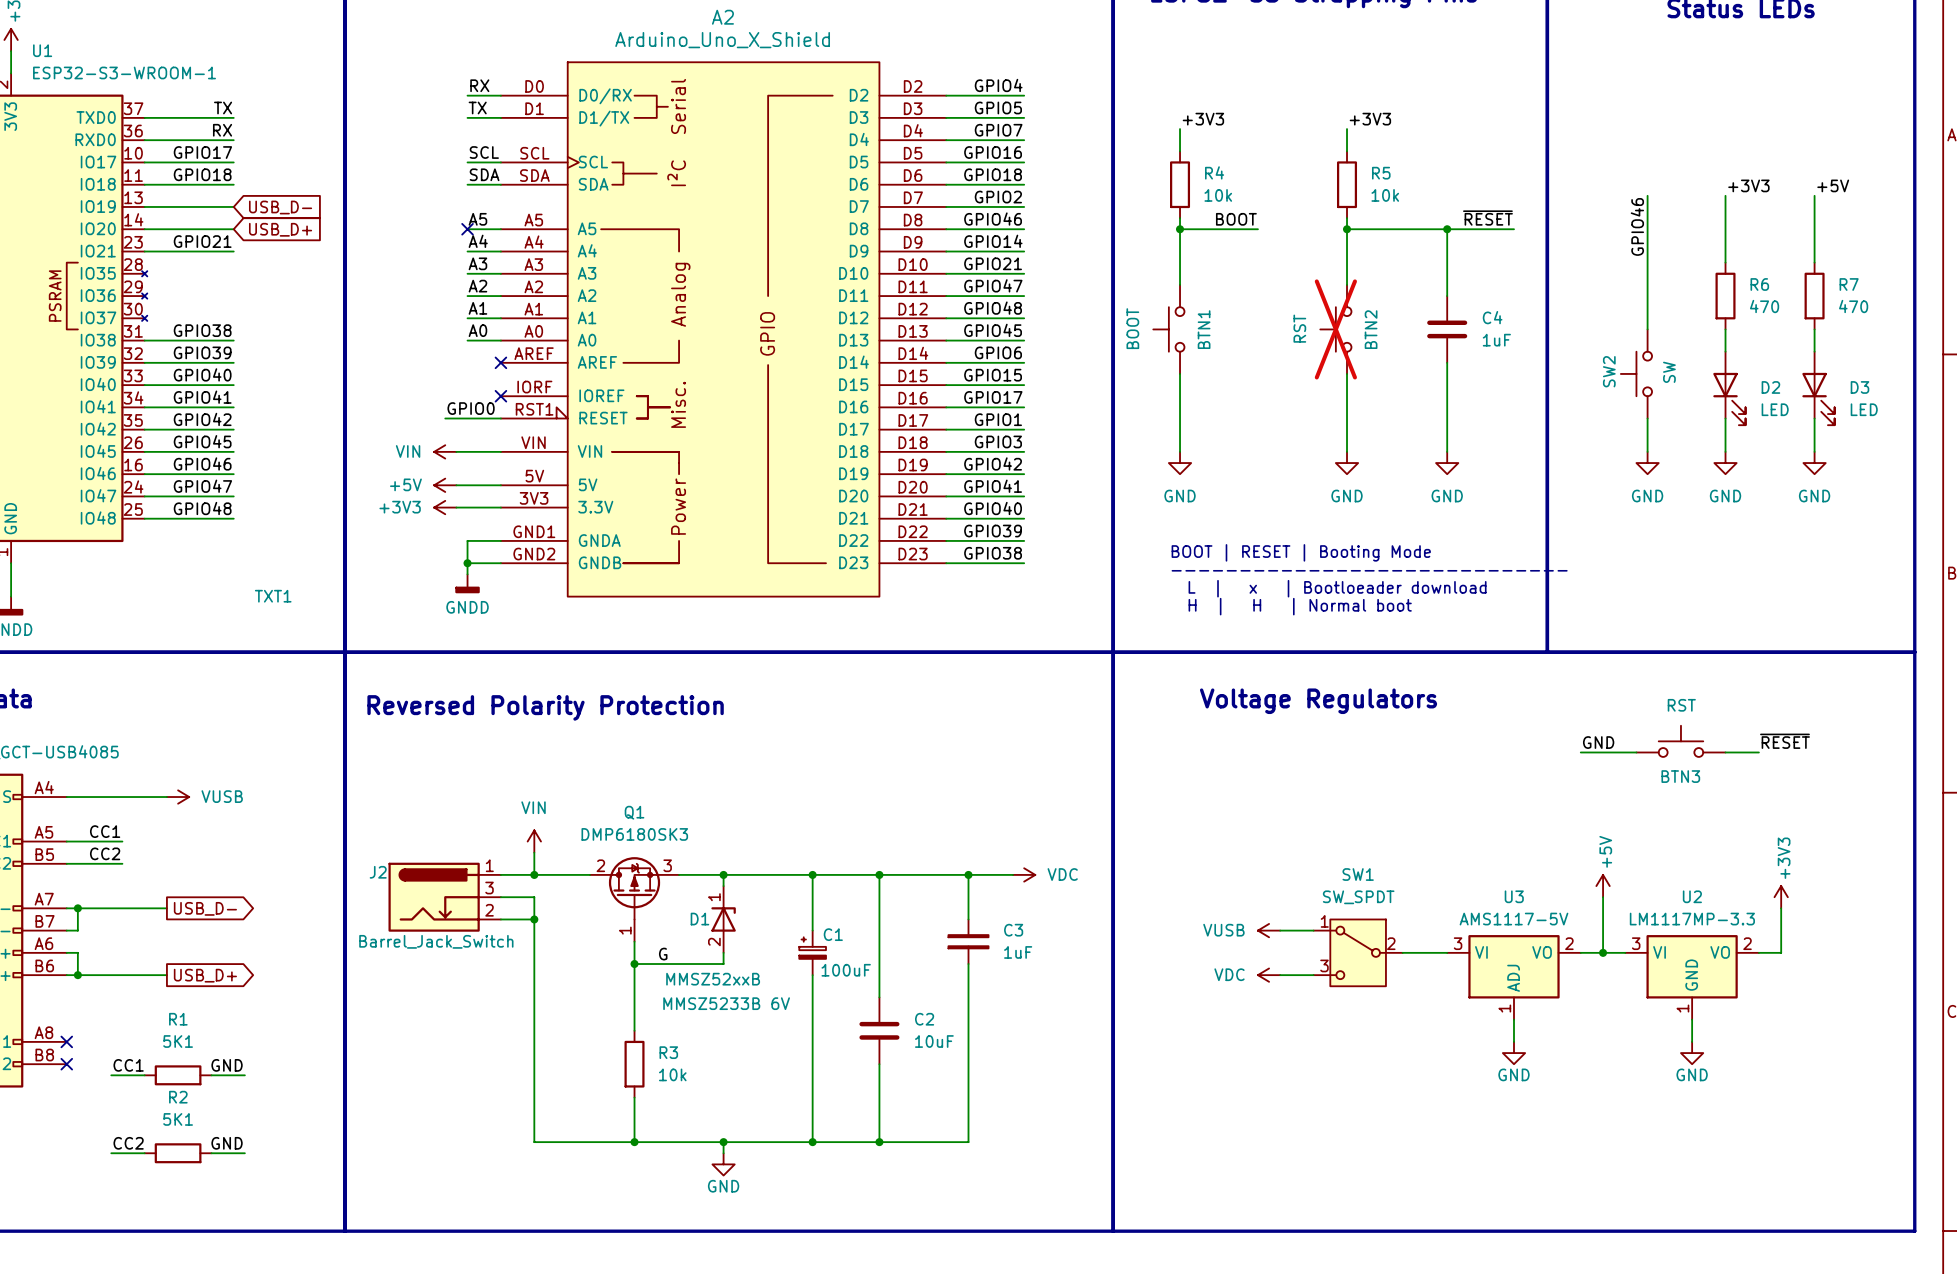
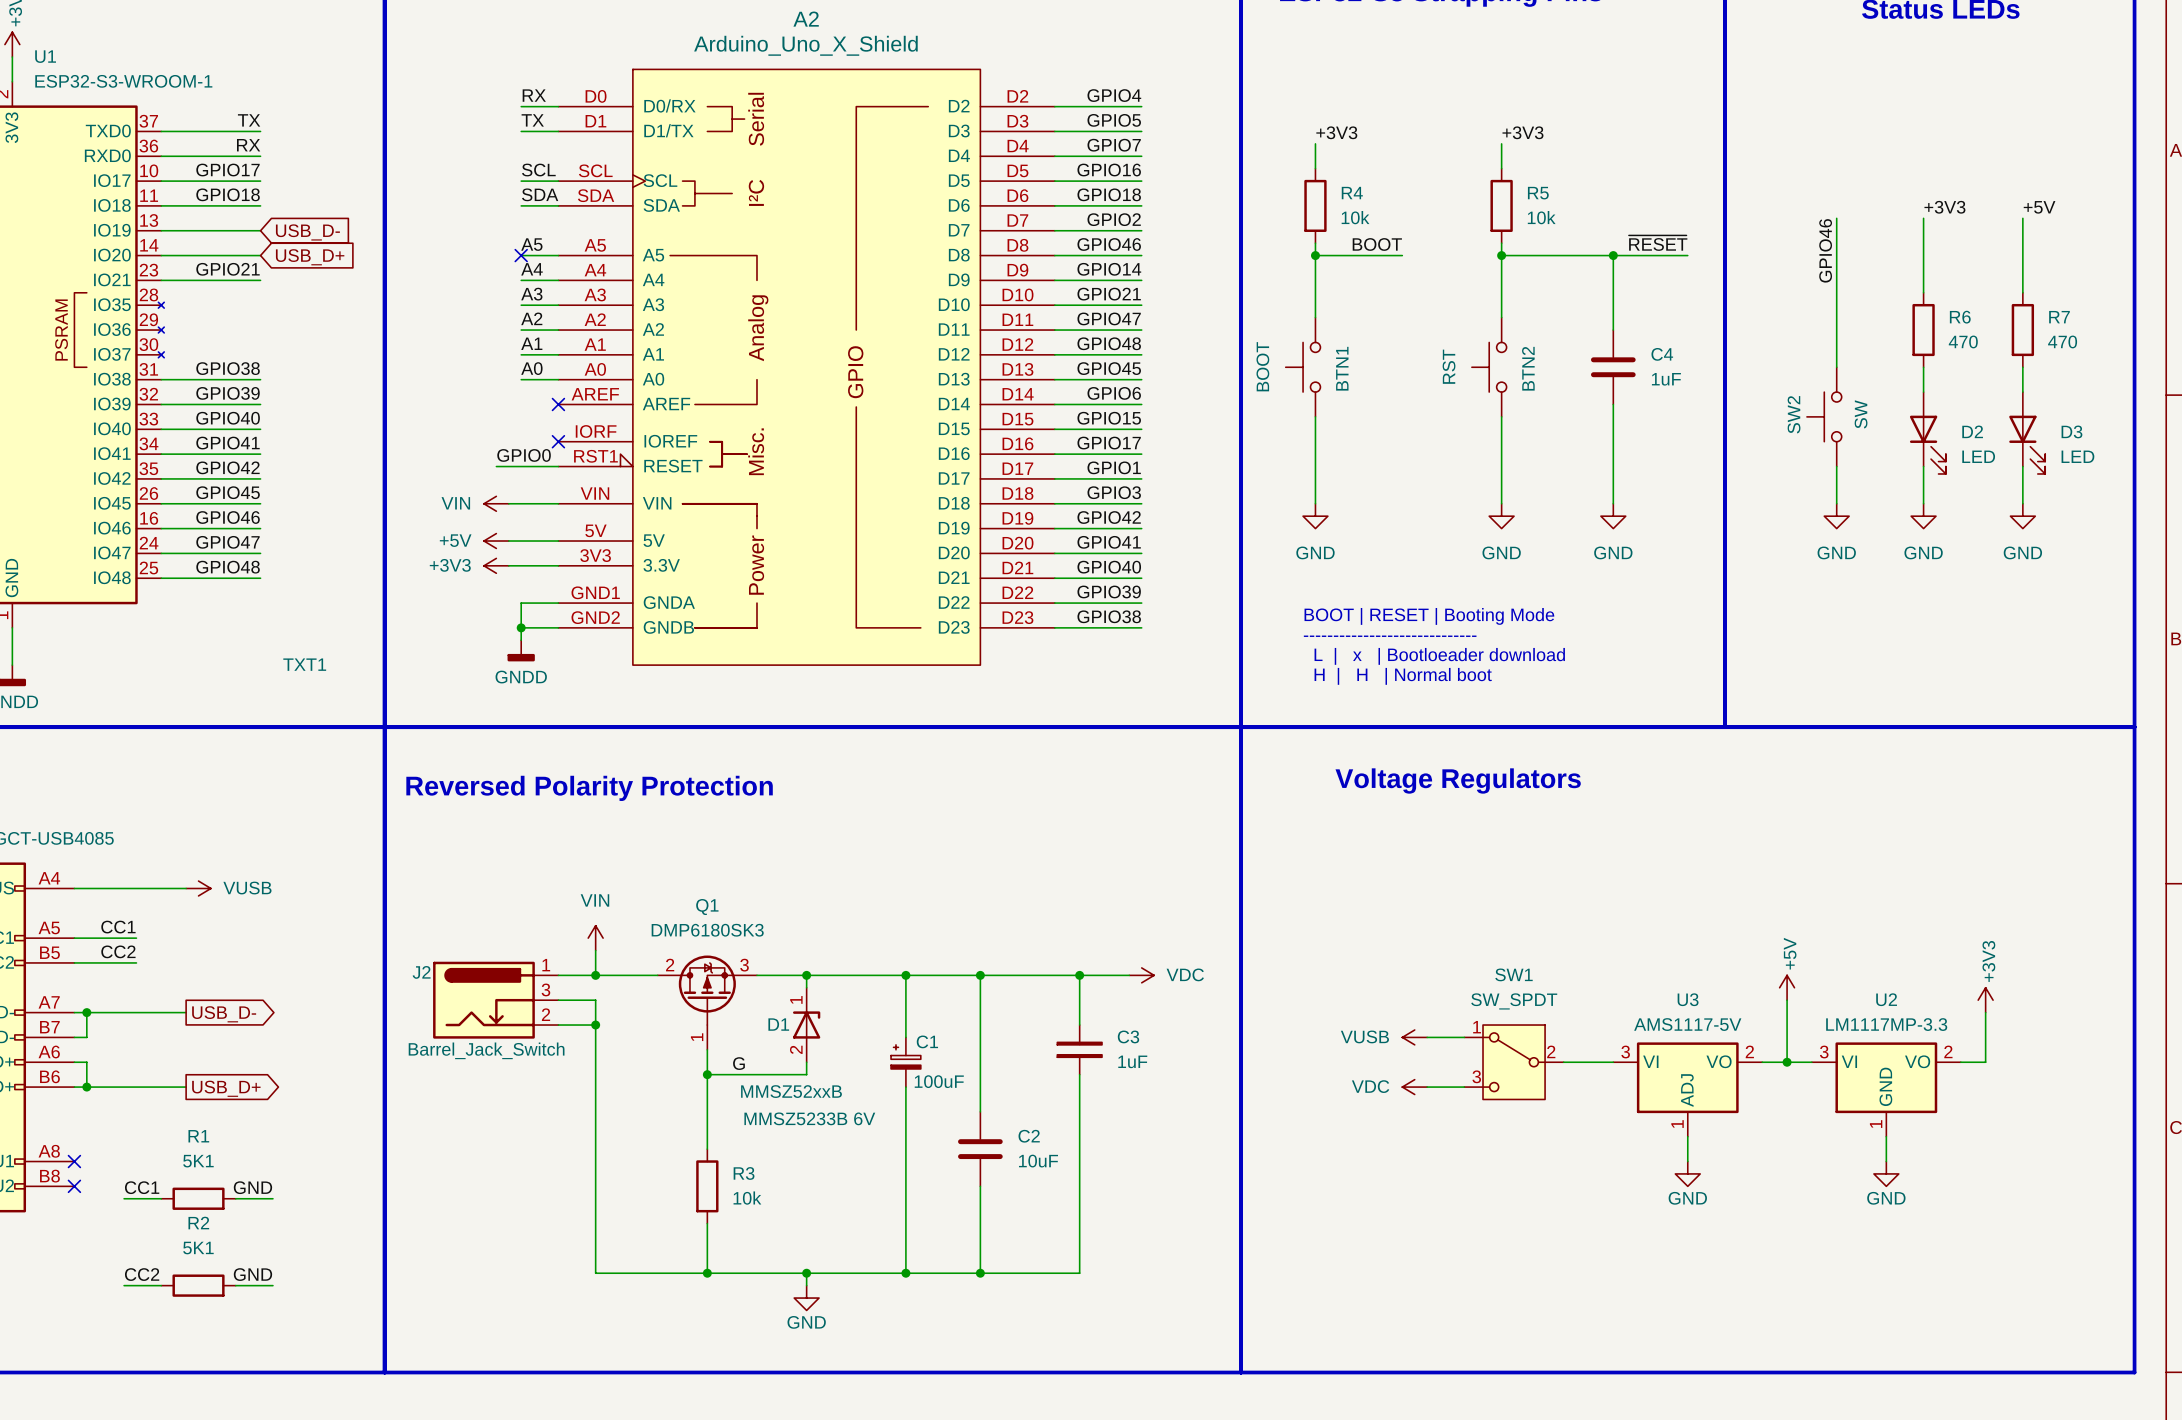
BTN2 do-not-place cross: (1335, 329) -> none
BTN3: RST (1680, 741) -> none
label: ~{RESET} (1785, 741) -> none
label: GND (1598, 742) -> none
wire: (1580, 752) (1636, 752) -> none
wire: (1725, 752) (1758, 752) -> none

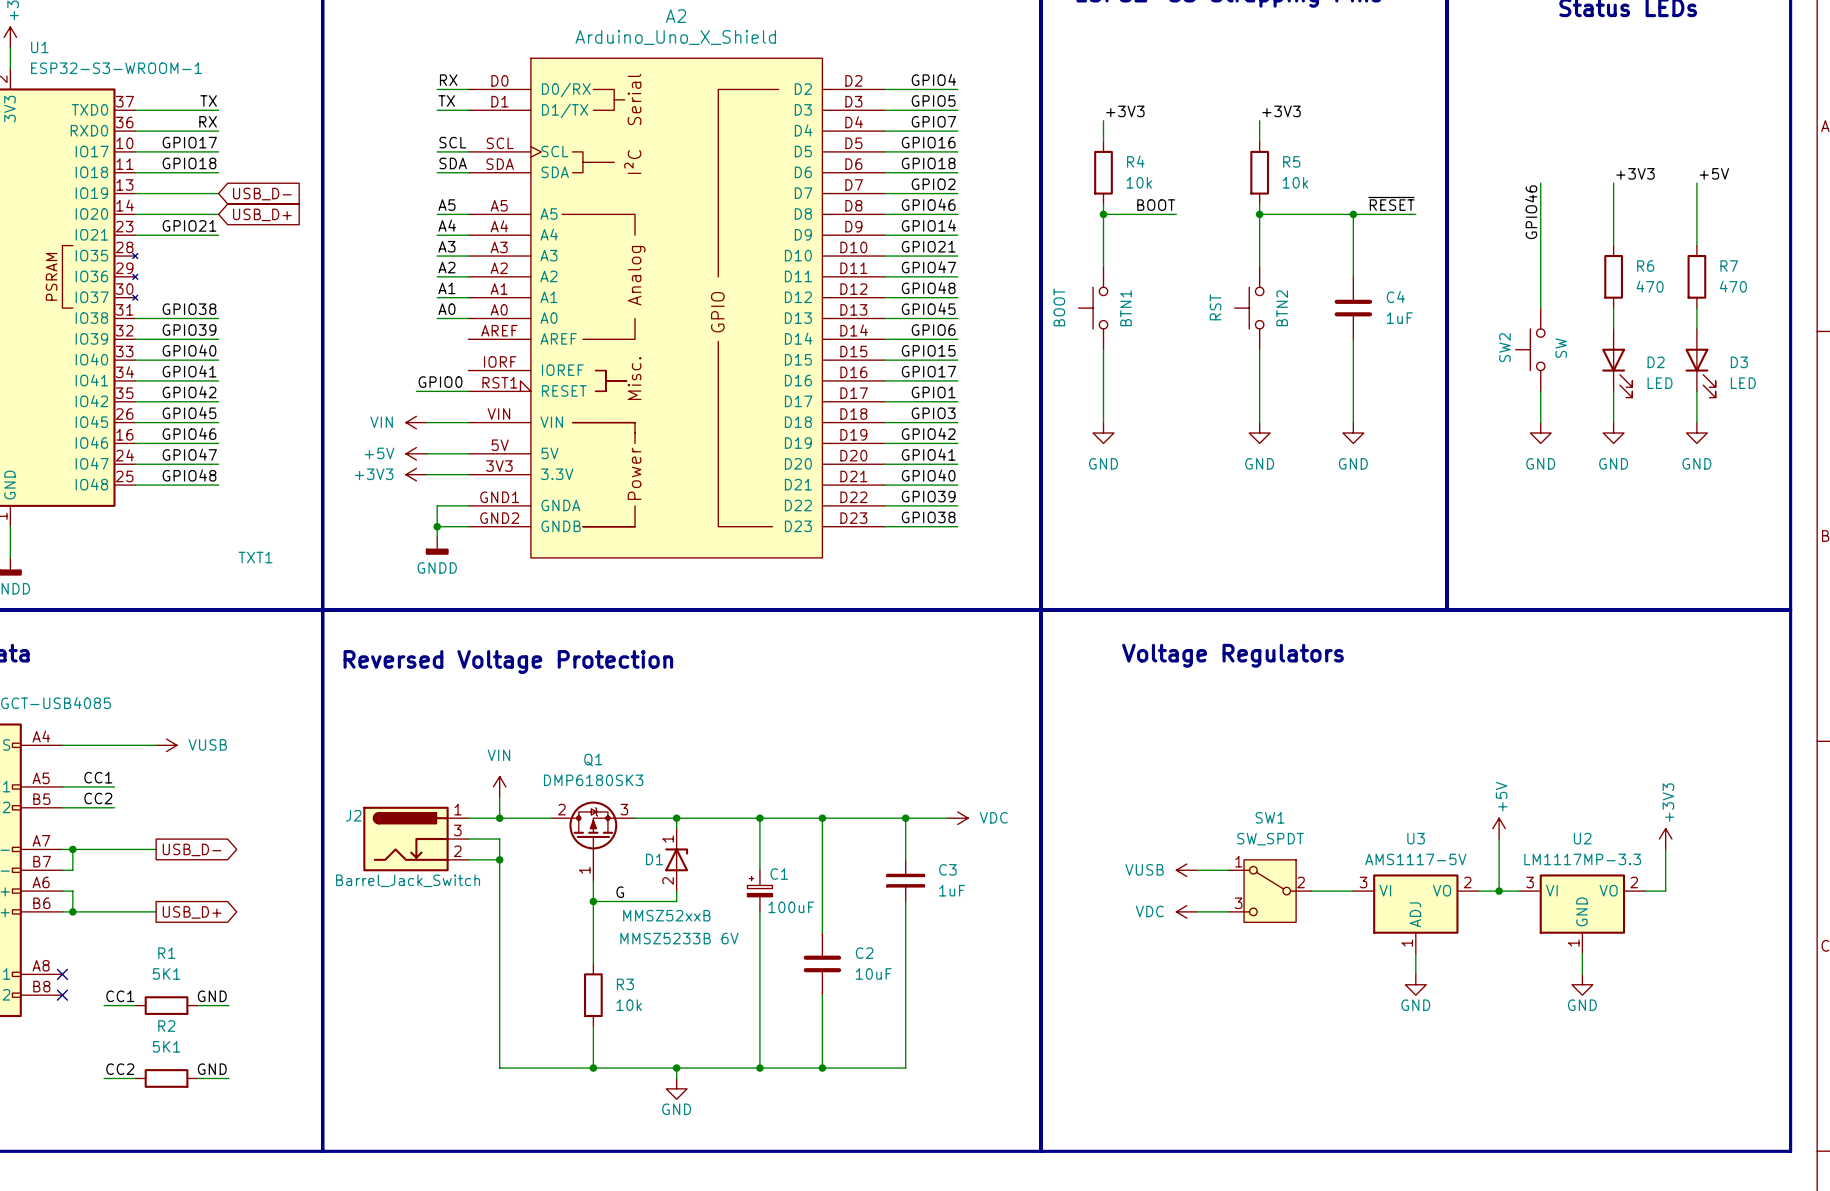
no-connect mark: (521, 255) -> none
no-connect mark: (558, 404) -> none
no-connect mark: (558, 441) -> none
text: BOOT | RESET | Booting Mode (1429, 616) -> none
text: ----------------------------- (1390, 636) -> none
text: L | x | Bootloeader download (1439, 656) -> none
text: H | H | Normal boot (1403, 676) -> none
text: Reversed Polarity Protection (589, 788) -> Reversed Voltage Protection (508, 662)

